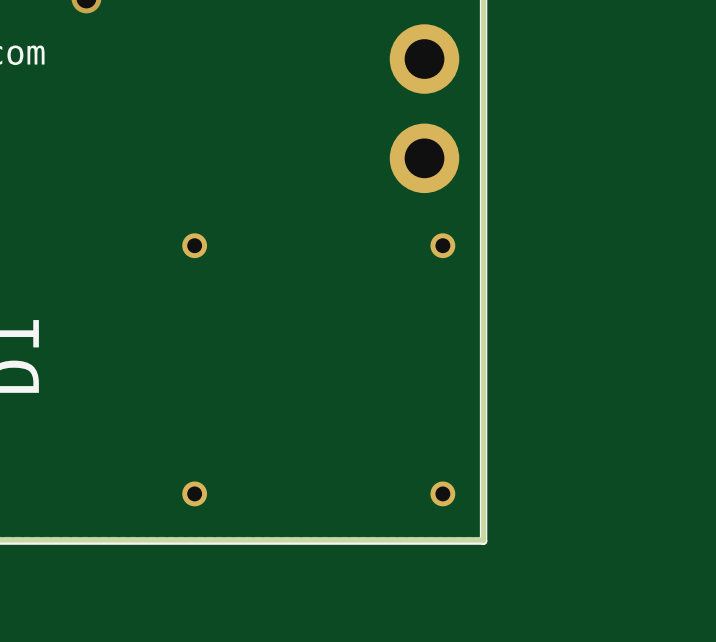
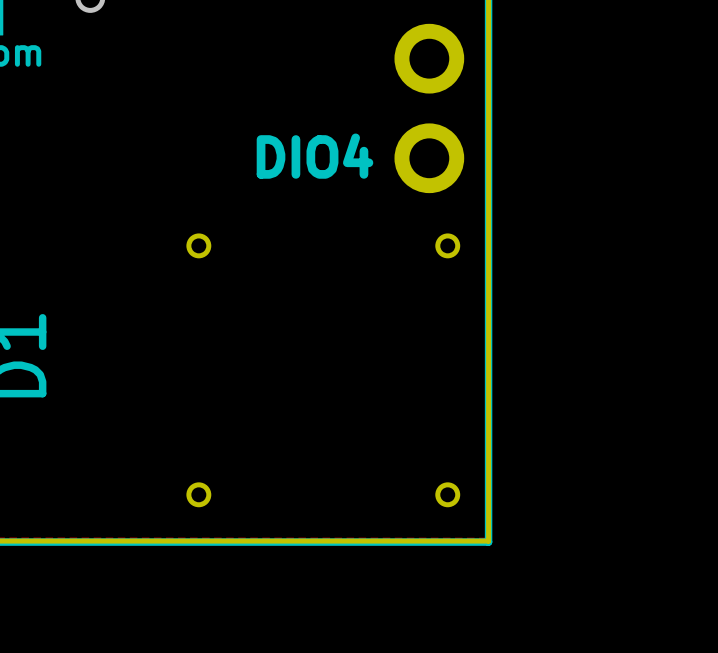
text: none -> DIO4 (315, 156)

